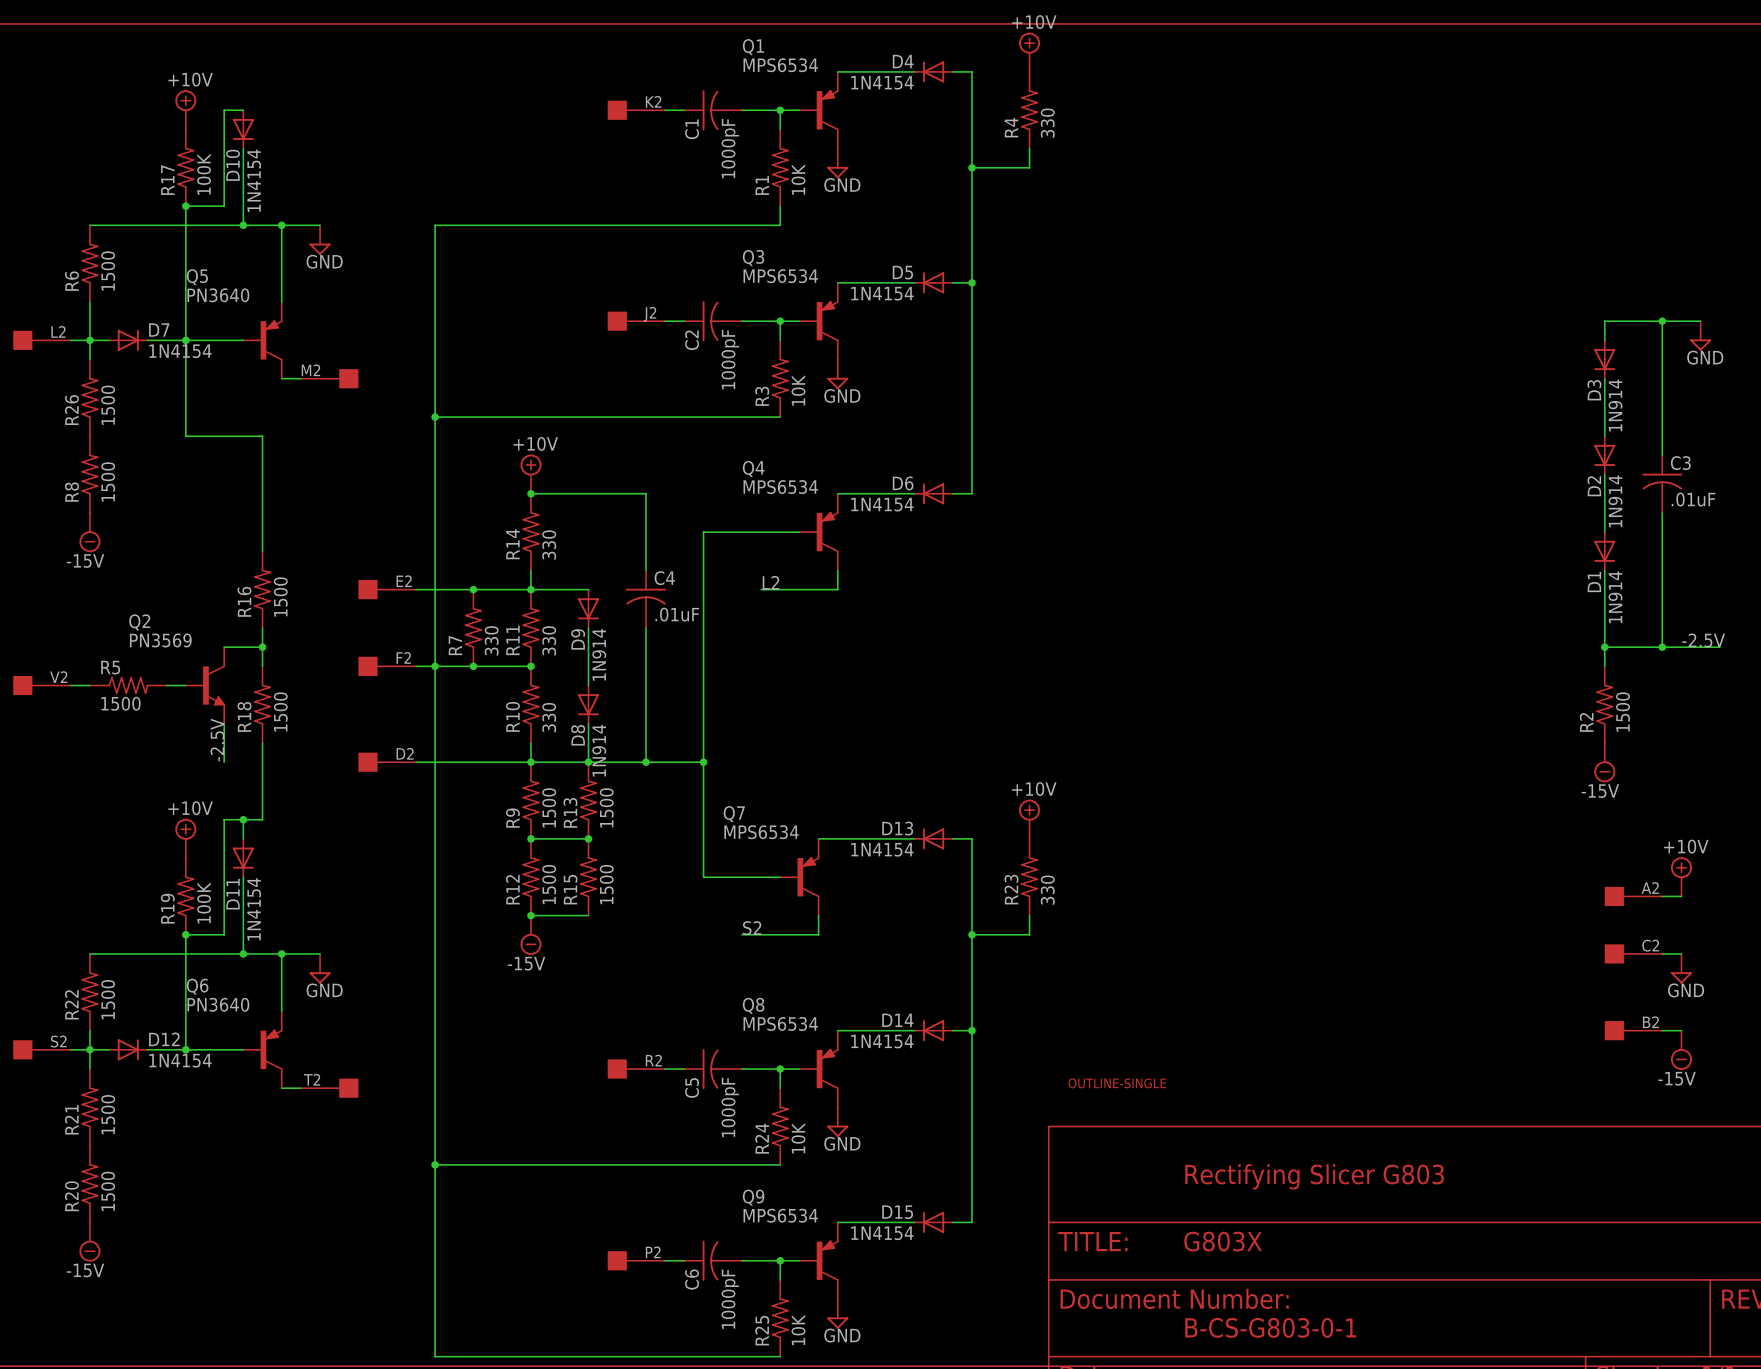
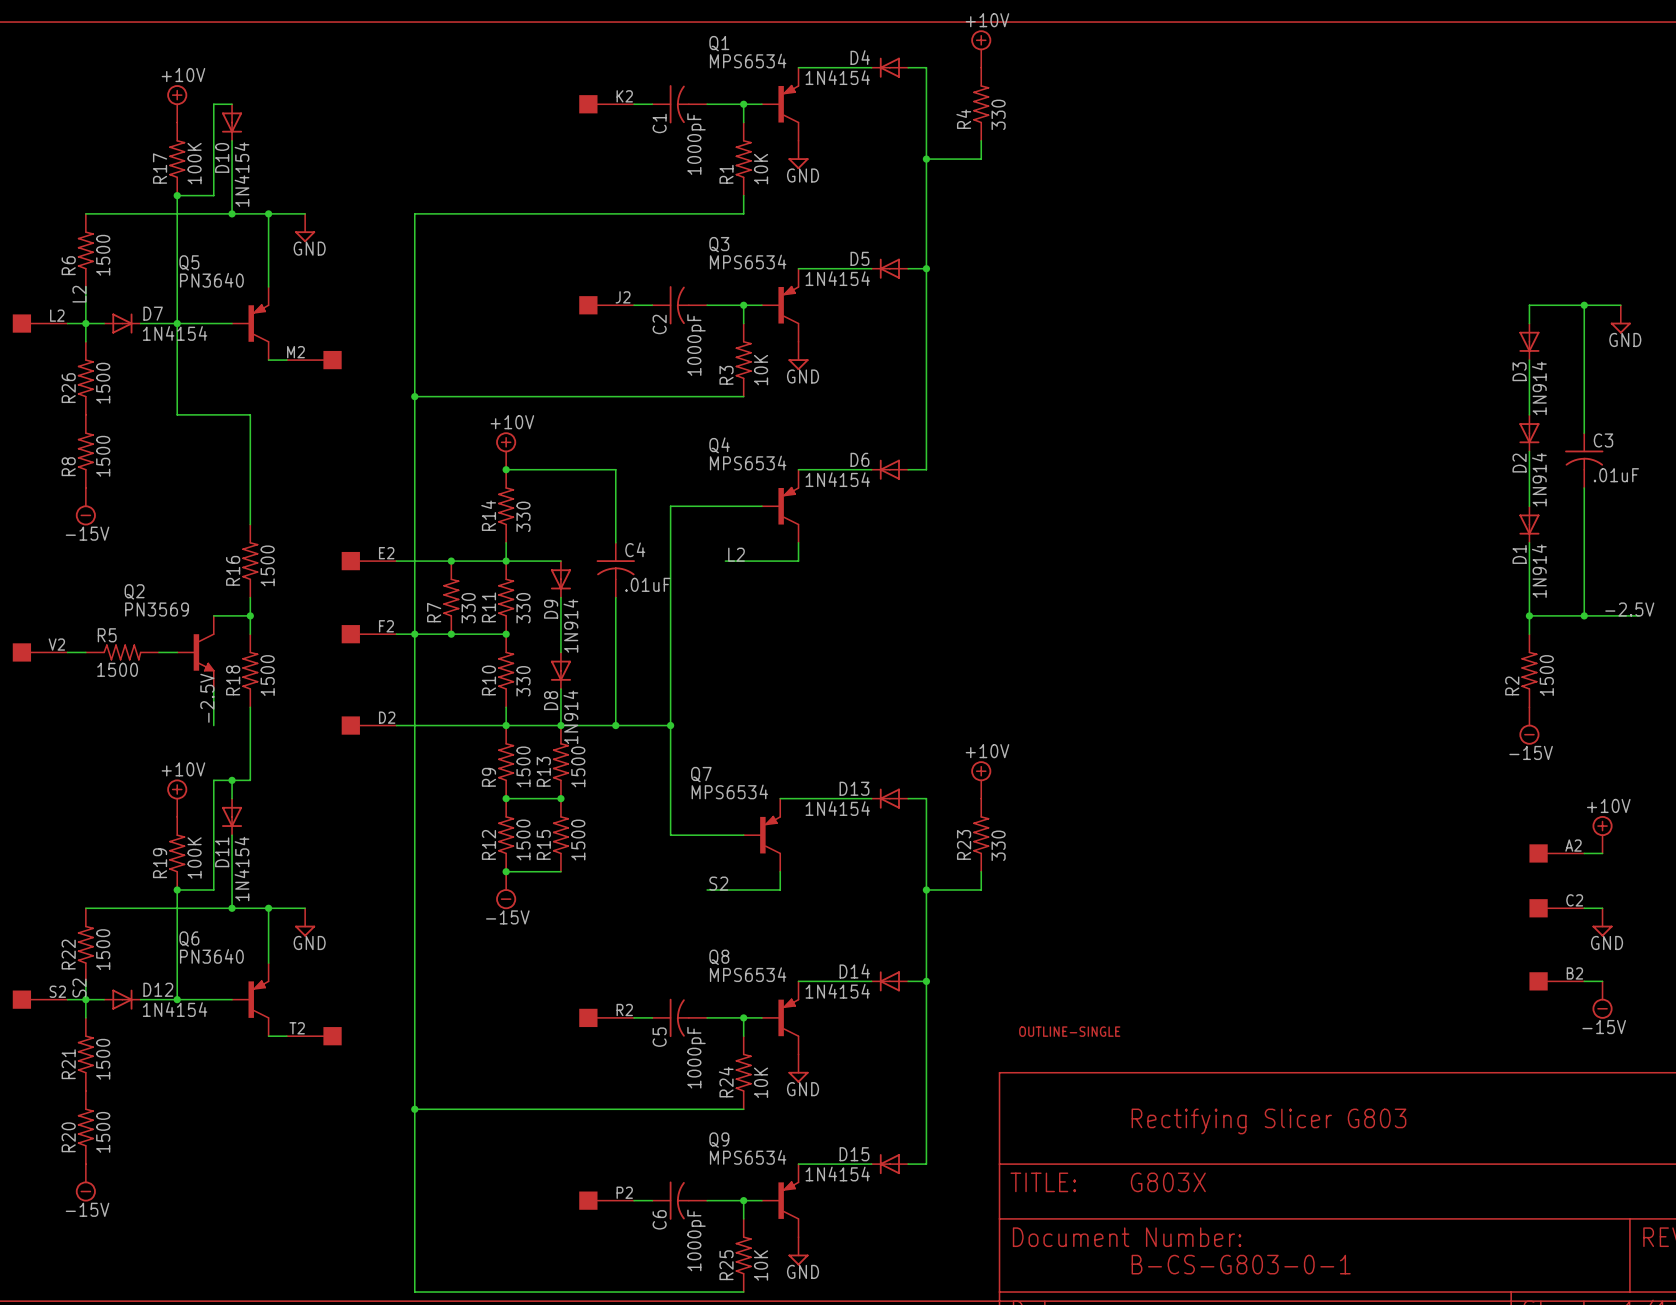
label: none -> L2 (79, 294)
label: none -> S2 (79, 988)

